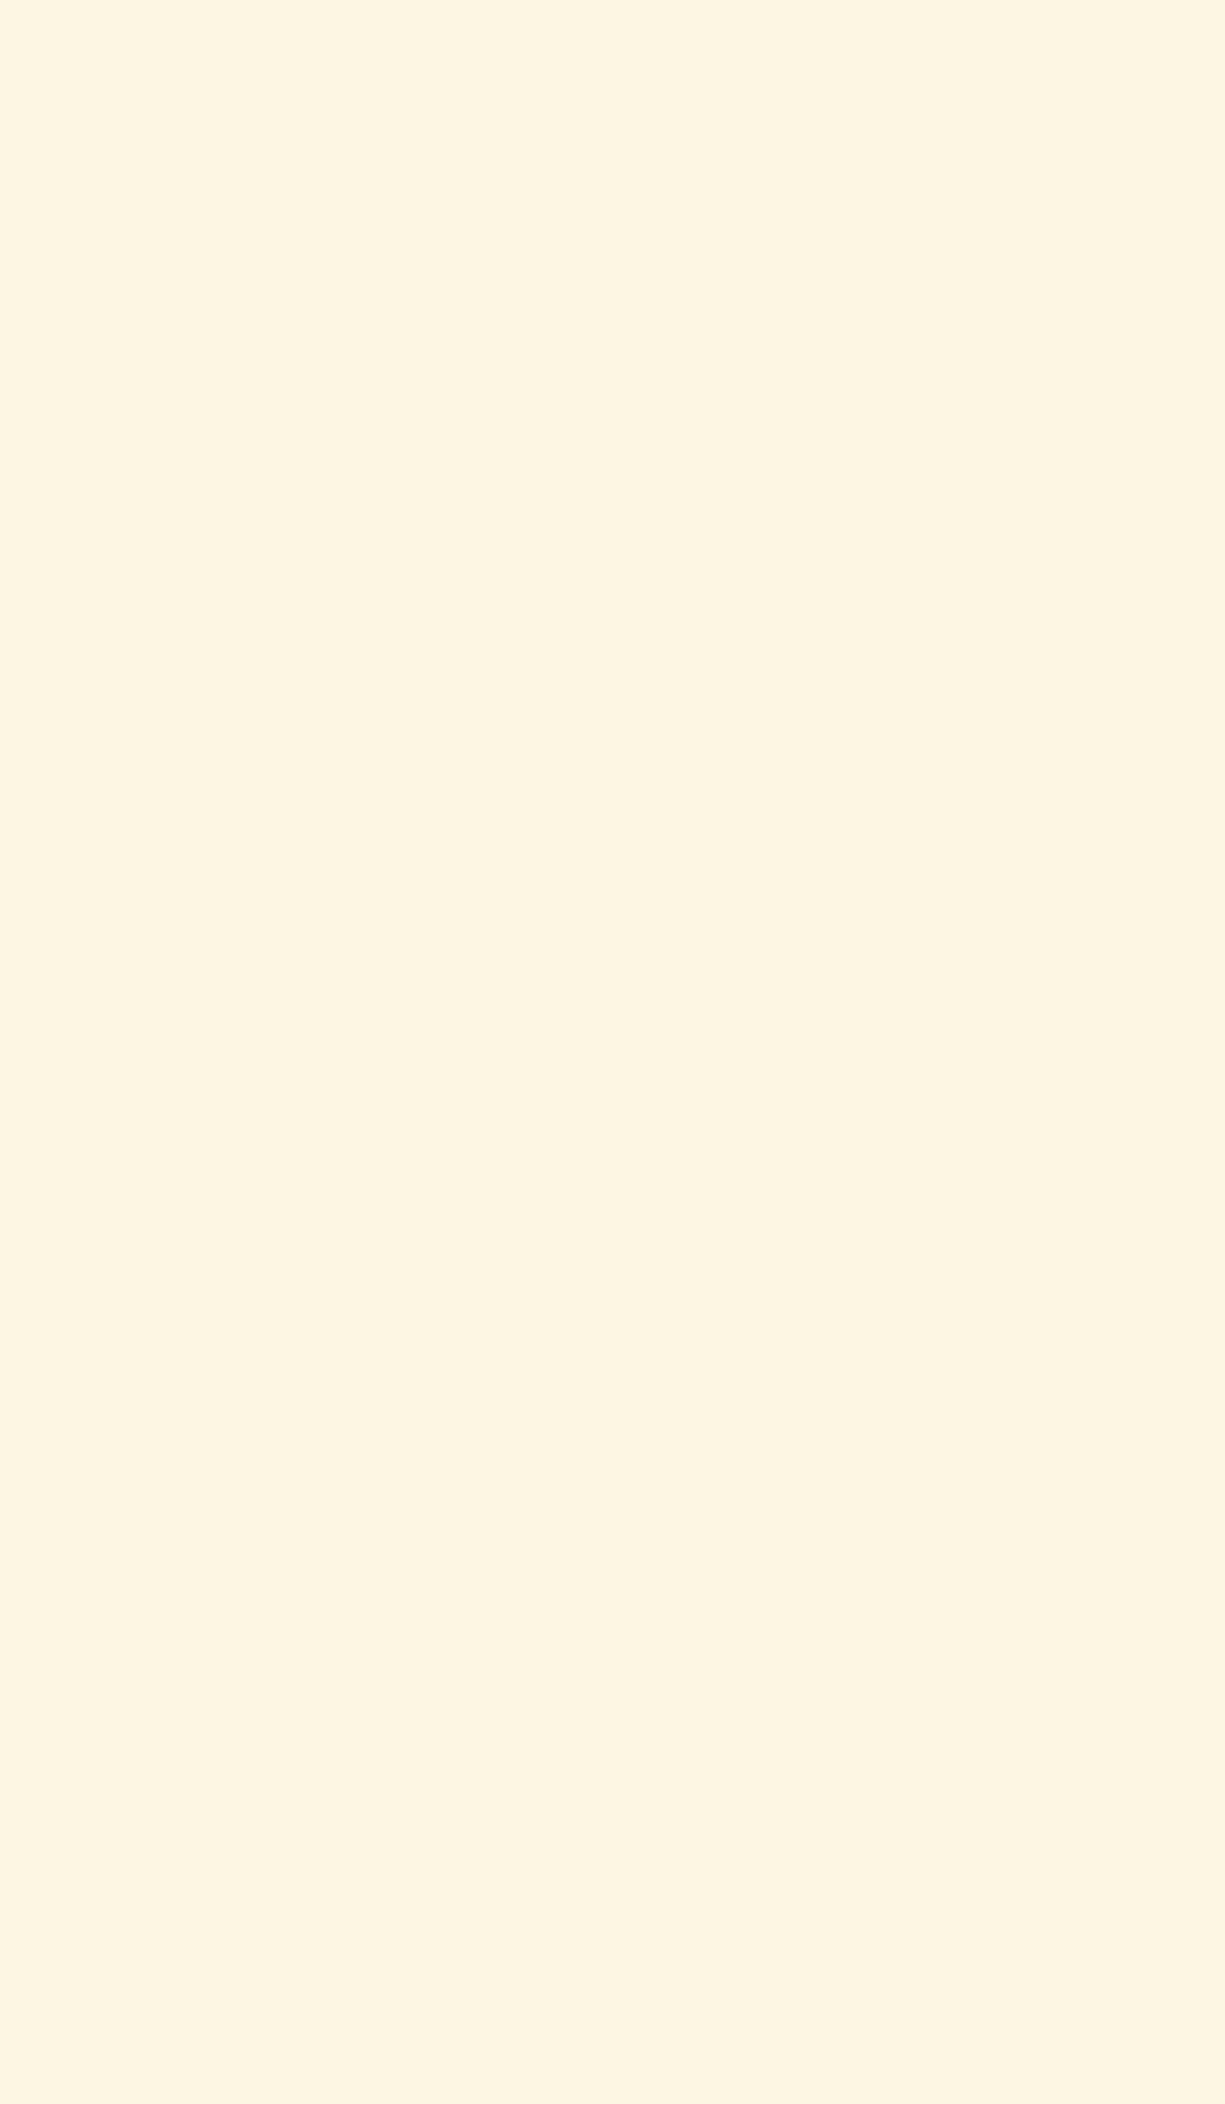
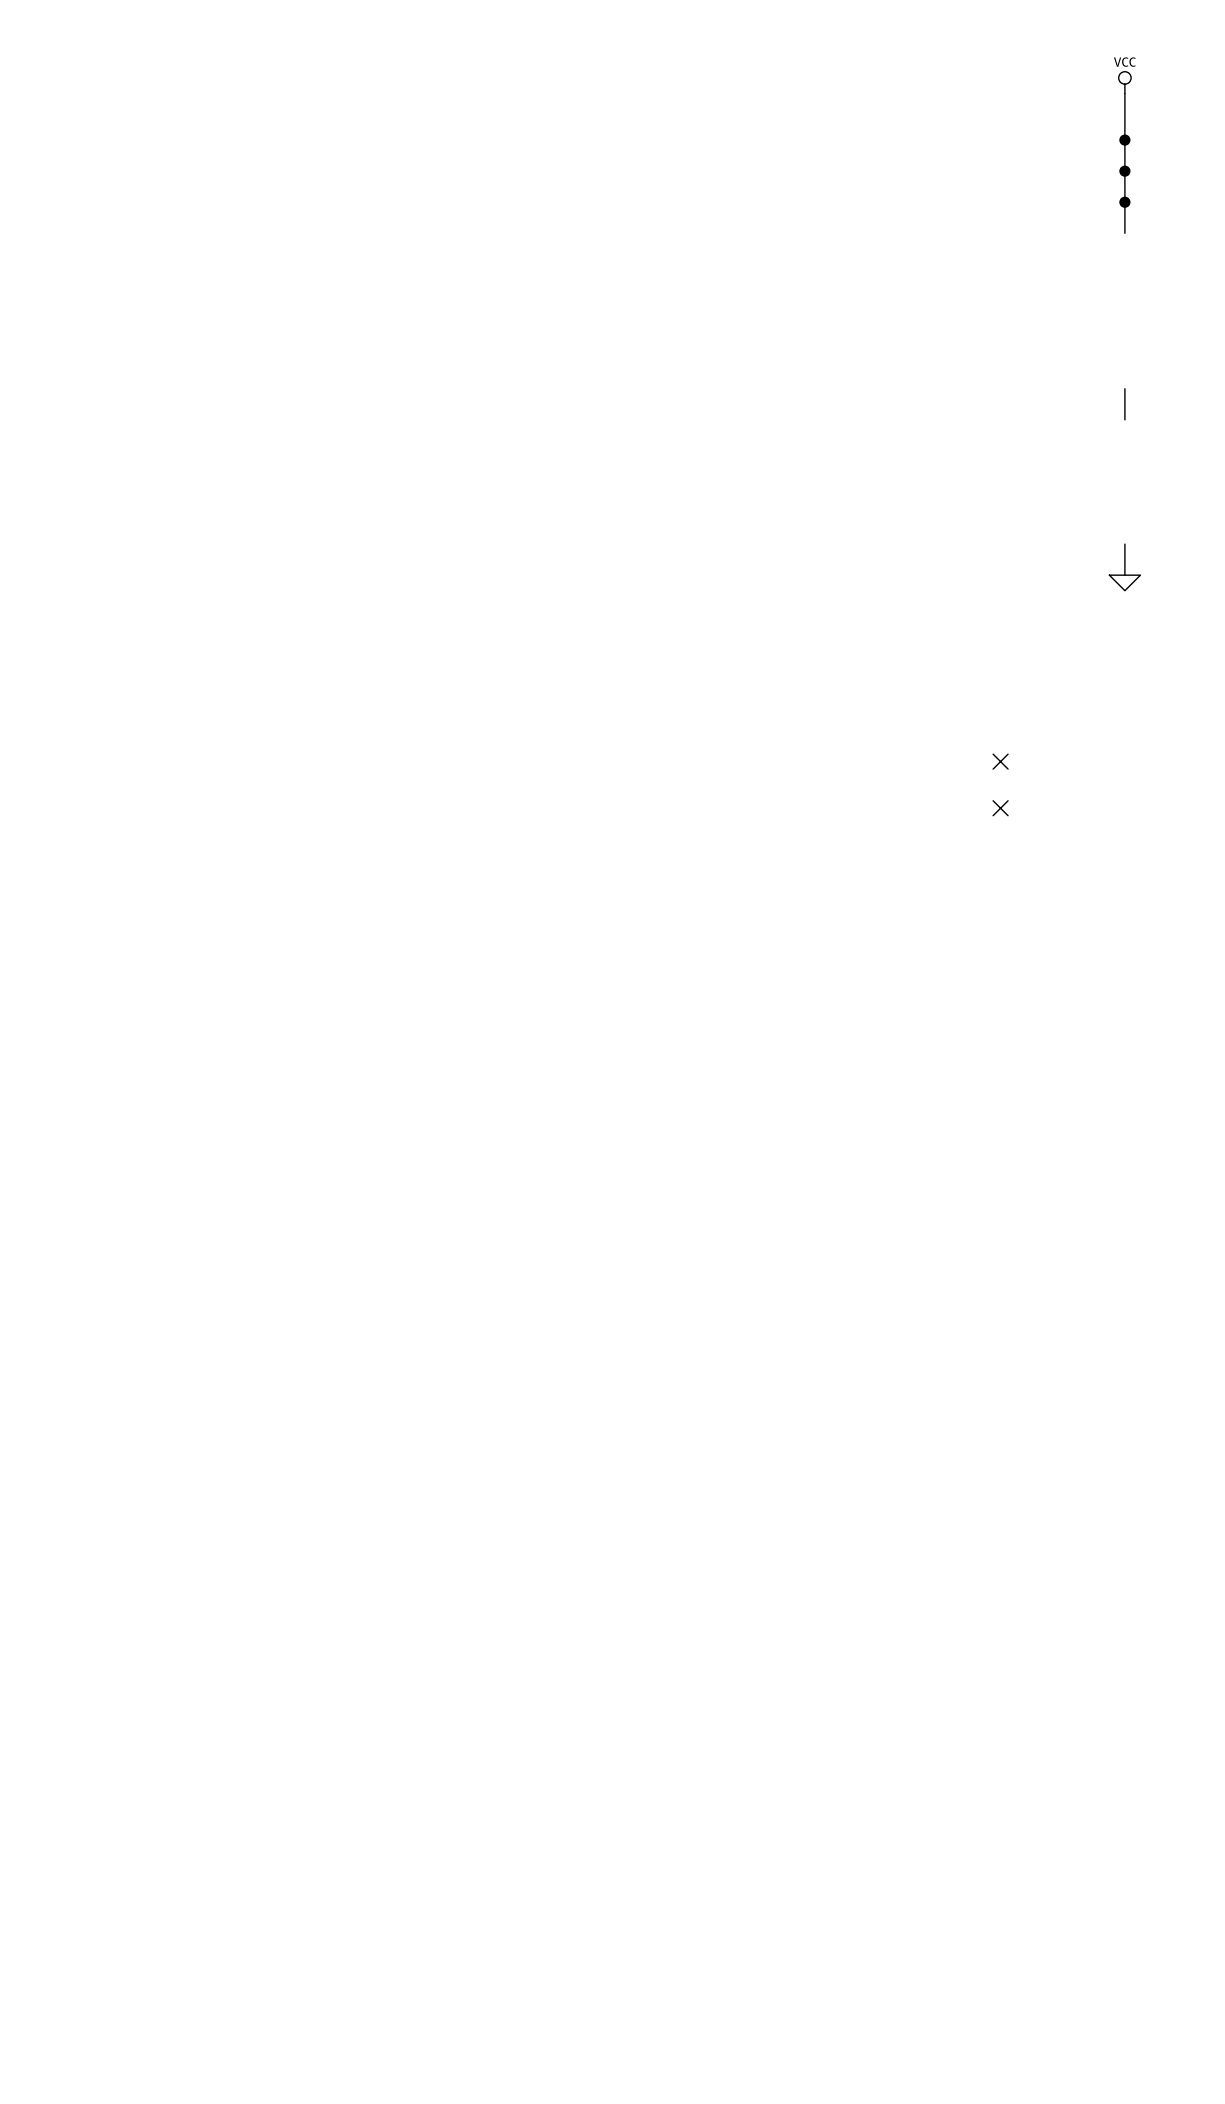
power symbol: none -> VCC (1124, 82)
wire: none -> (1124, 93) (1124, 233)
junction: none -> (1124, 140)
junction: none -> (1124, 171)
junction: none -> (1124, 202)
wire: none -> (1124, 388) (1124, 419)
wire: none -> (1124, 544) (1124, 575)
power symbol: none -> (1124, 582)
no-connect mark: none -> (1000, 761)
no-connect mark: none -> (1000, 808)

